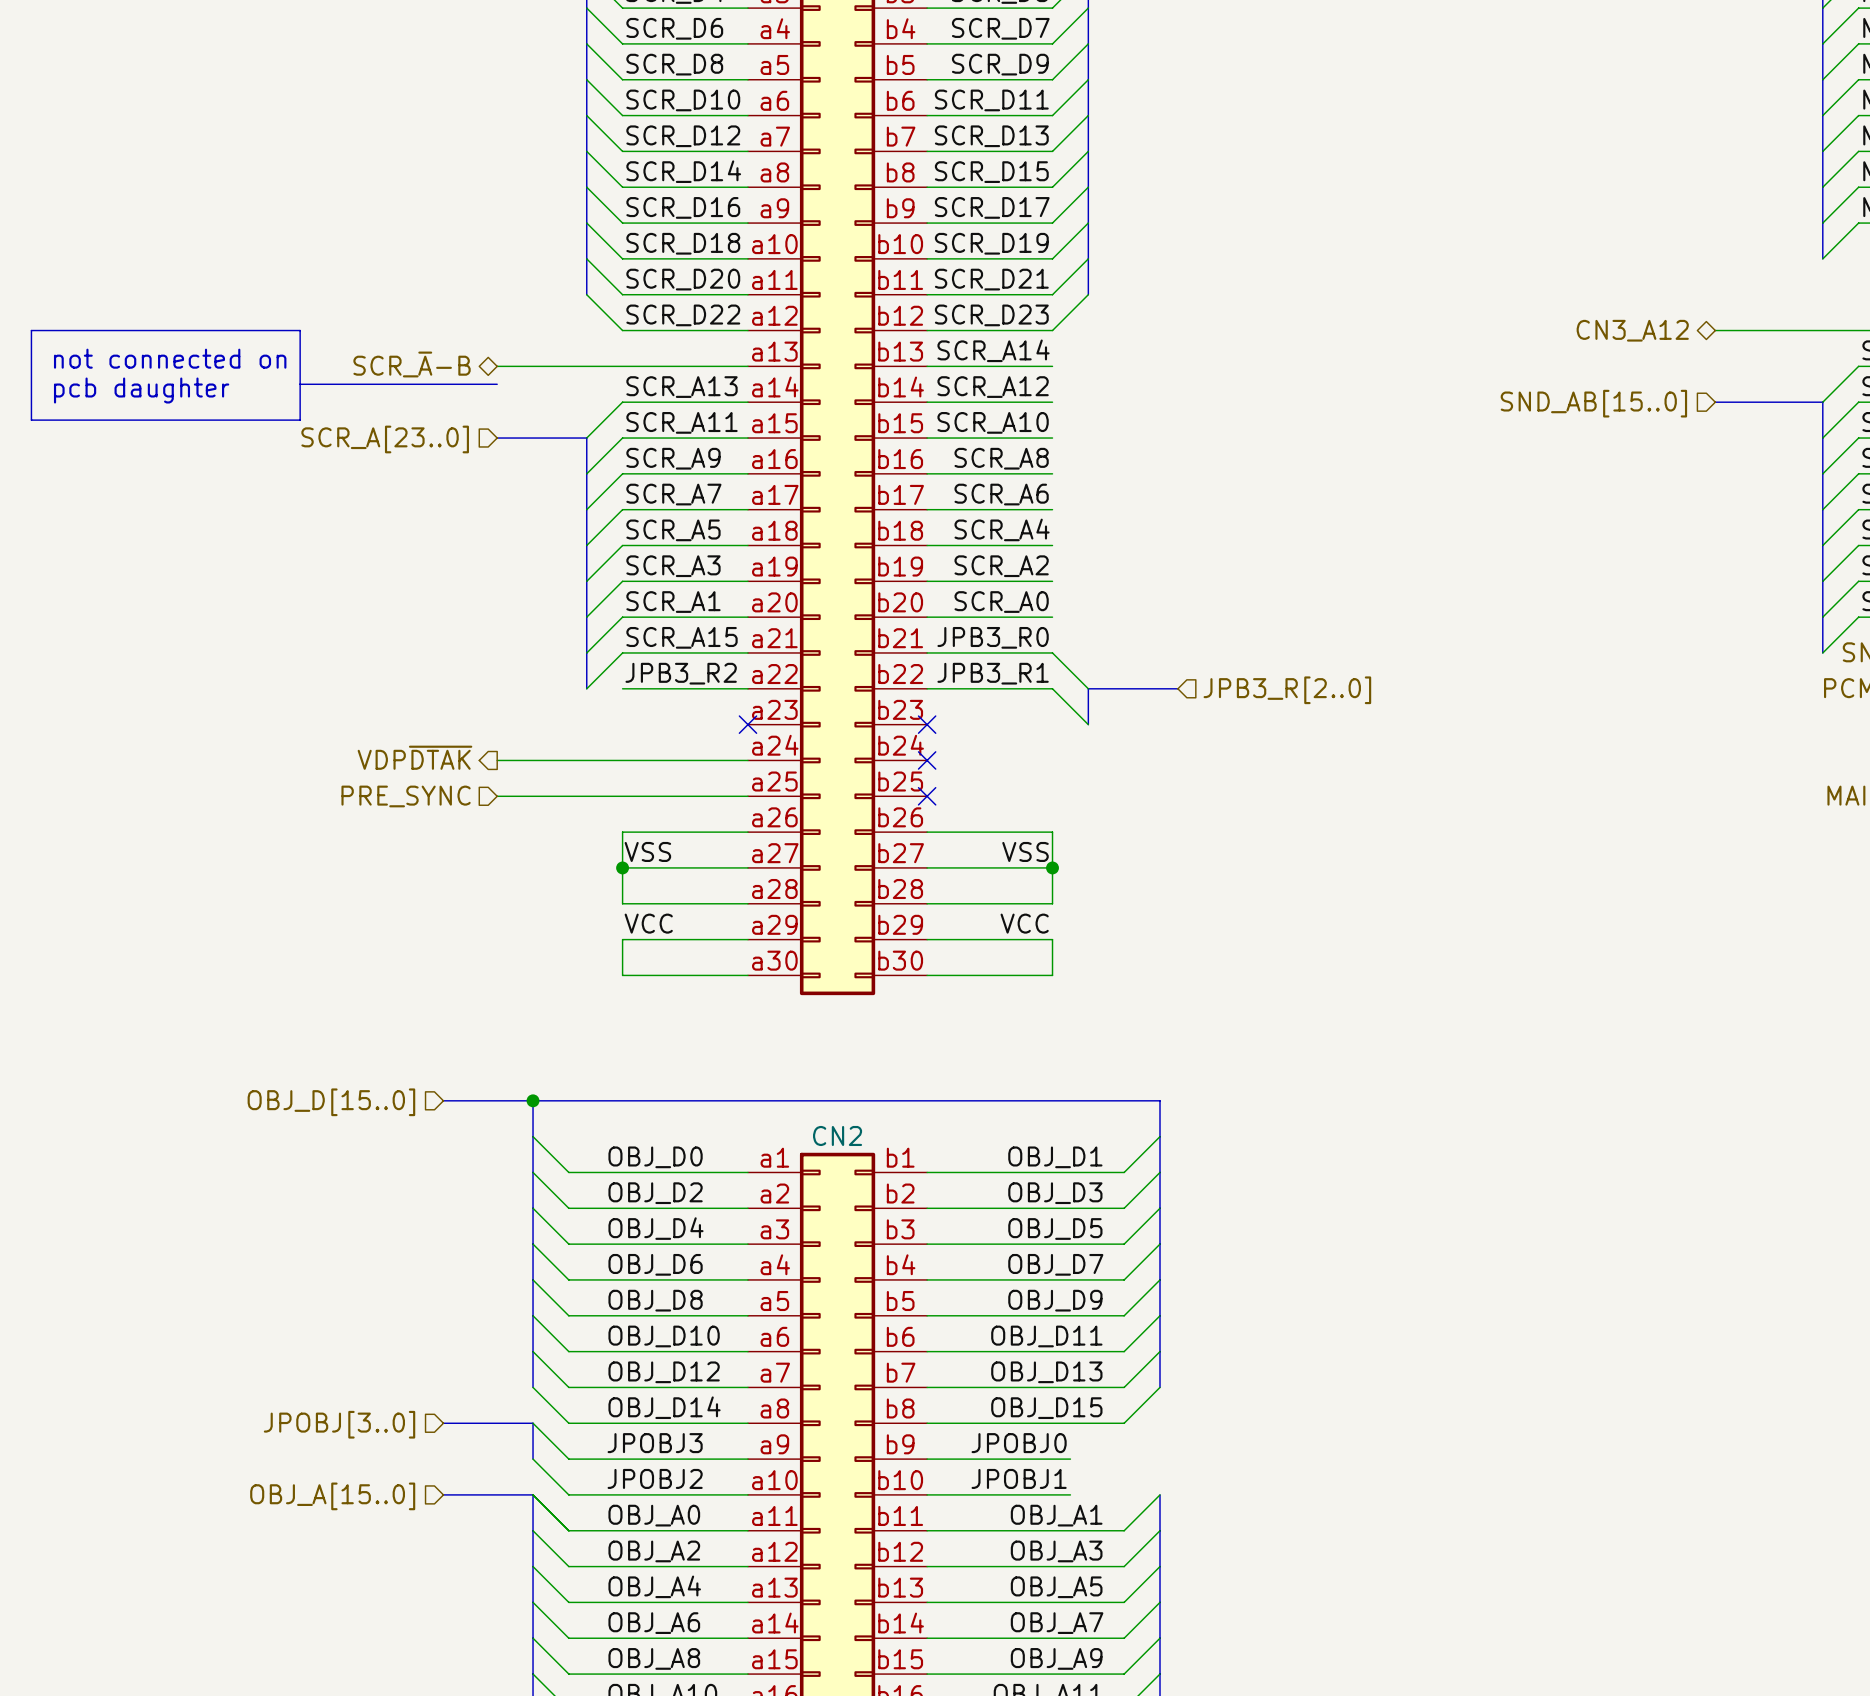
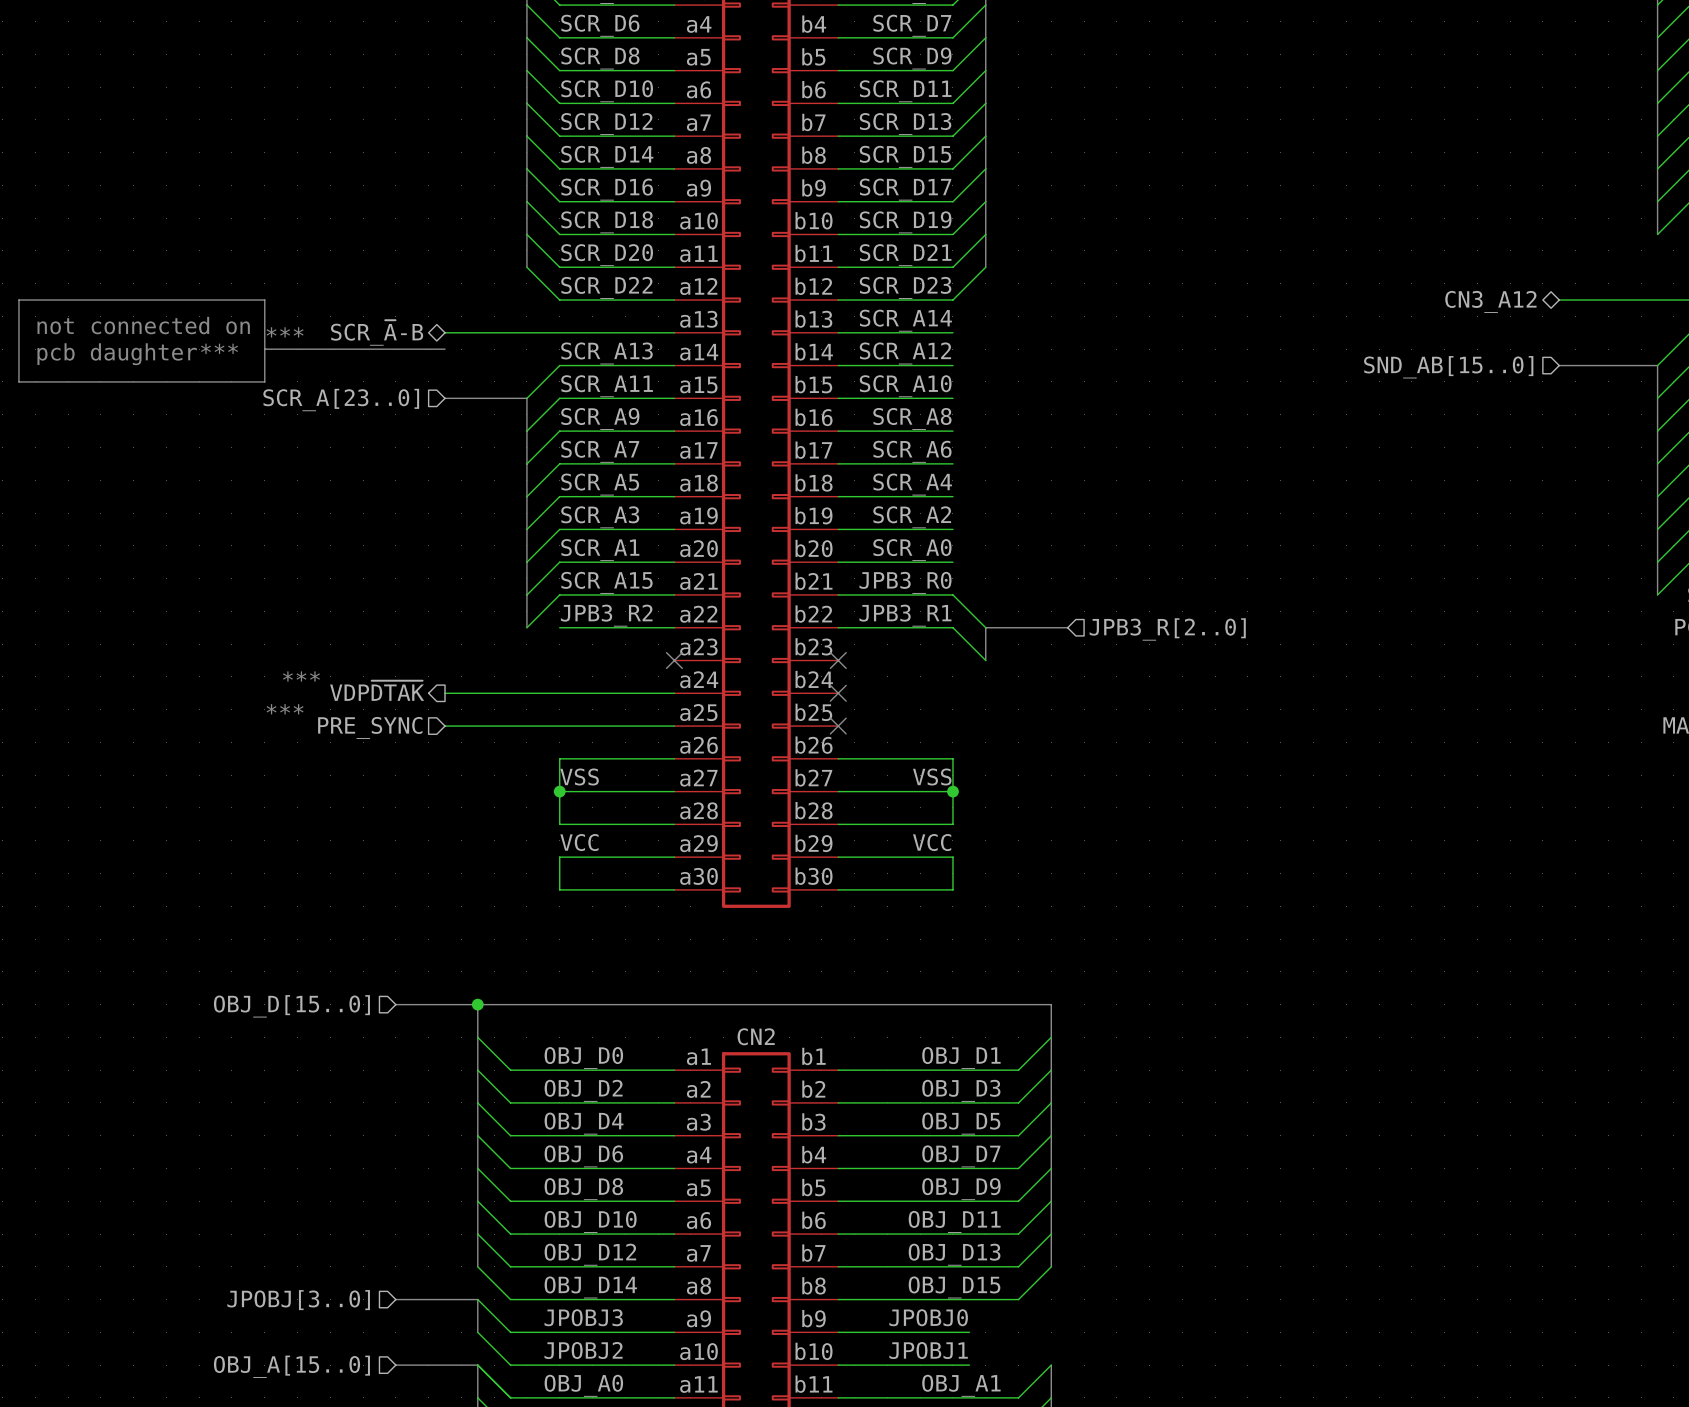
text: none -> *** (285, 332)
text: none -> *** (219, 348)
text: none -> *** (301, 676)
text: none -> *** (285, 709)

